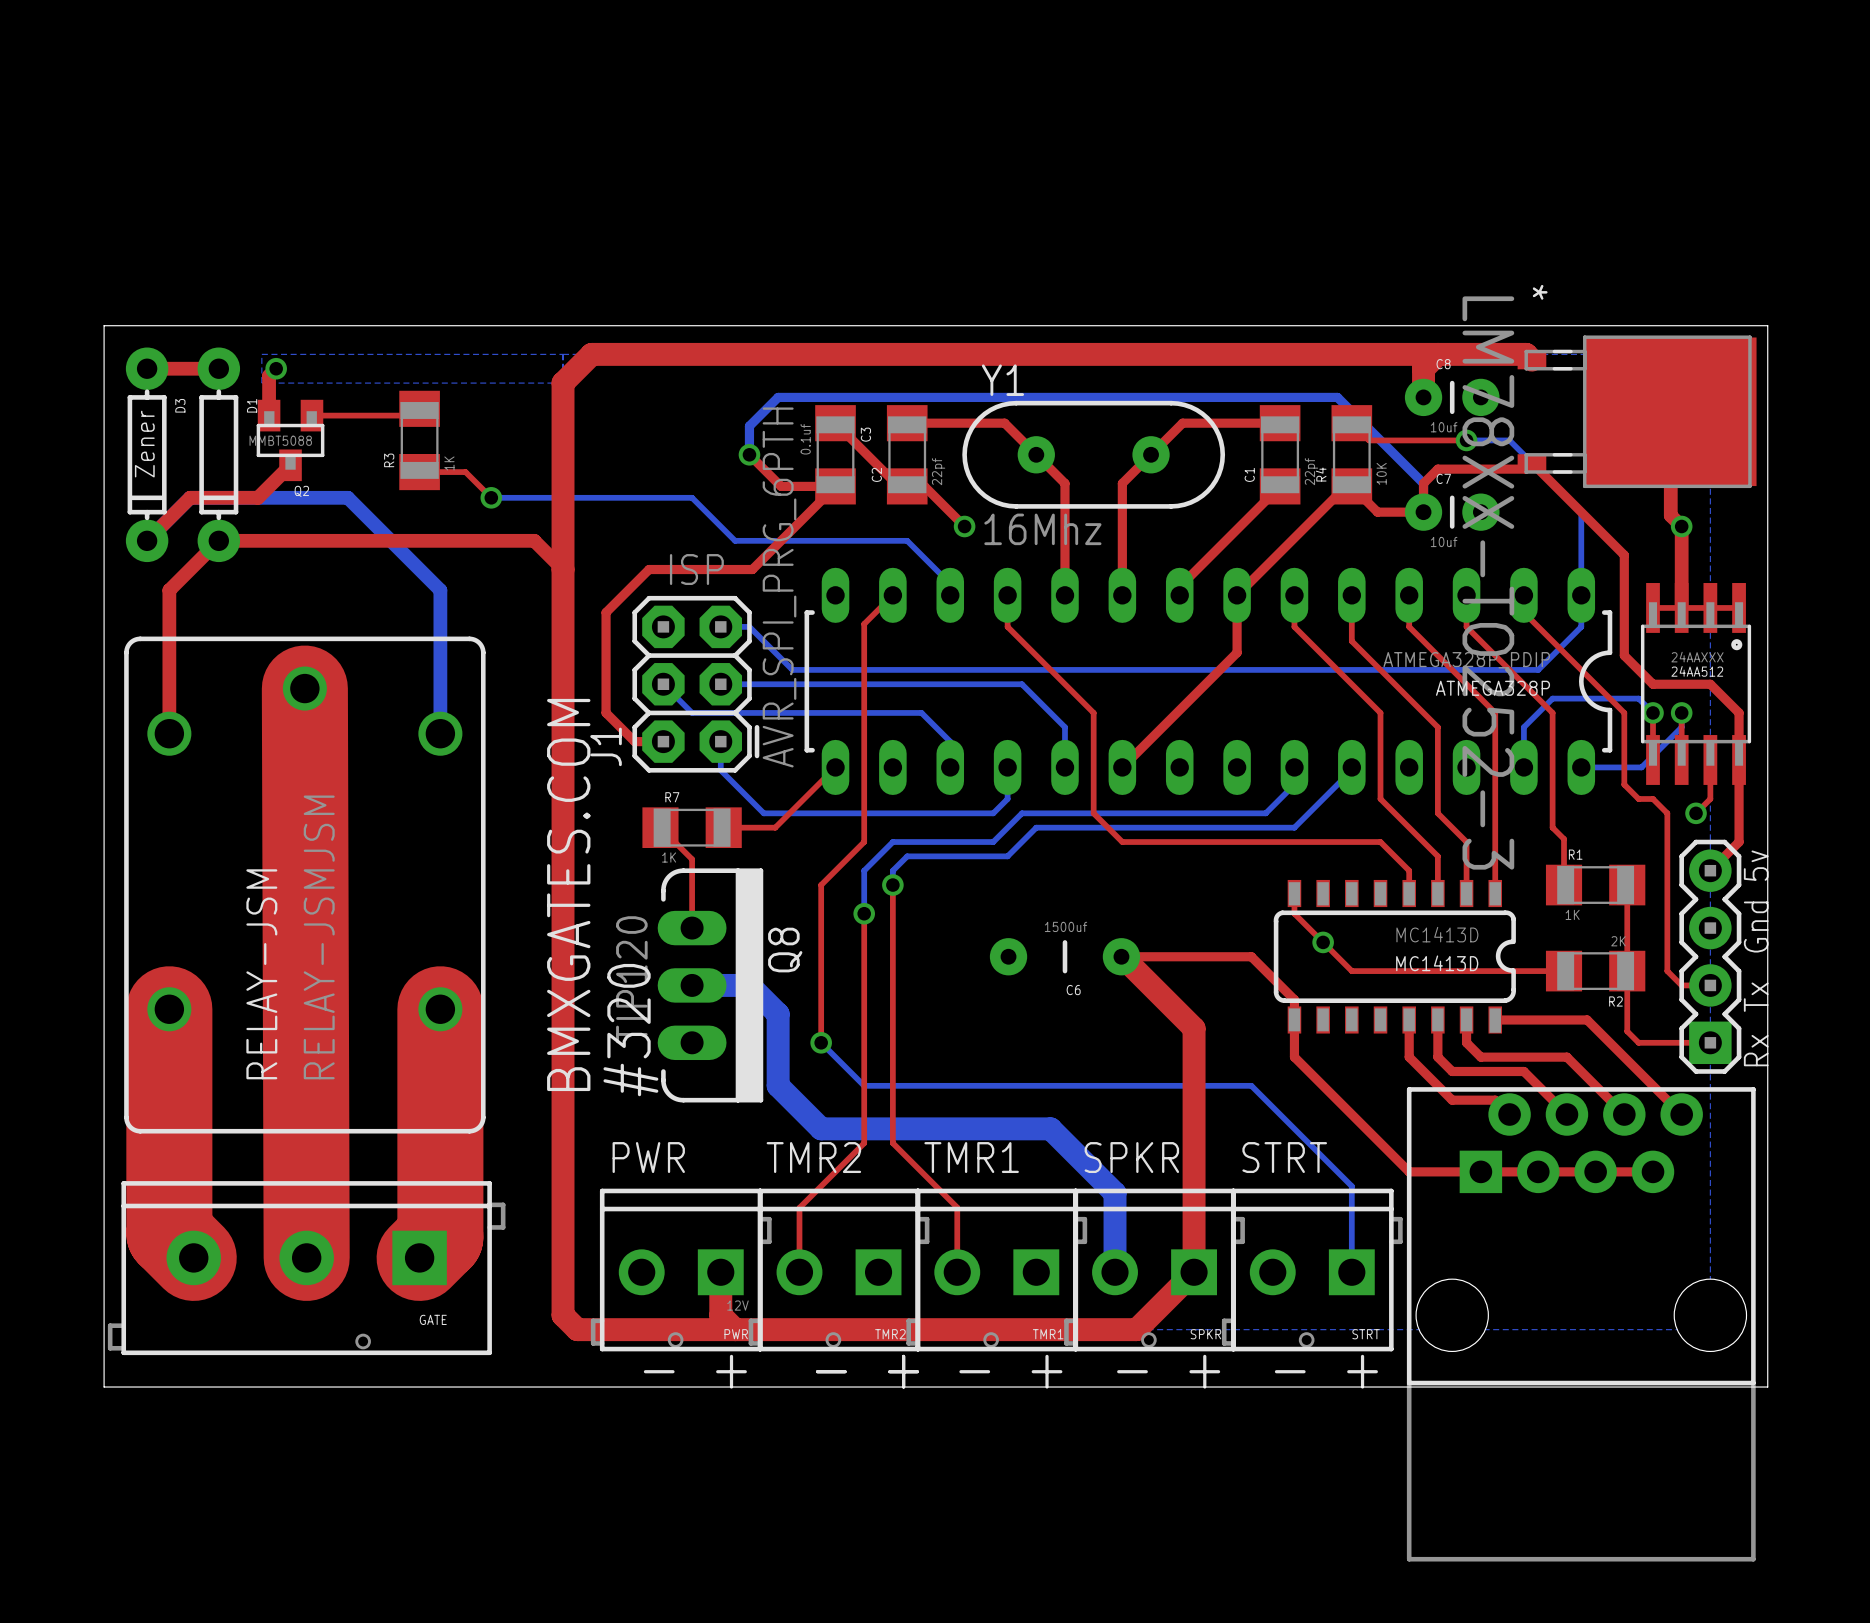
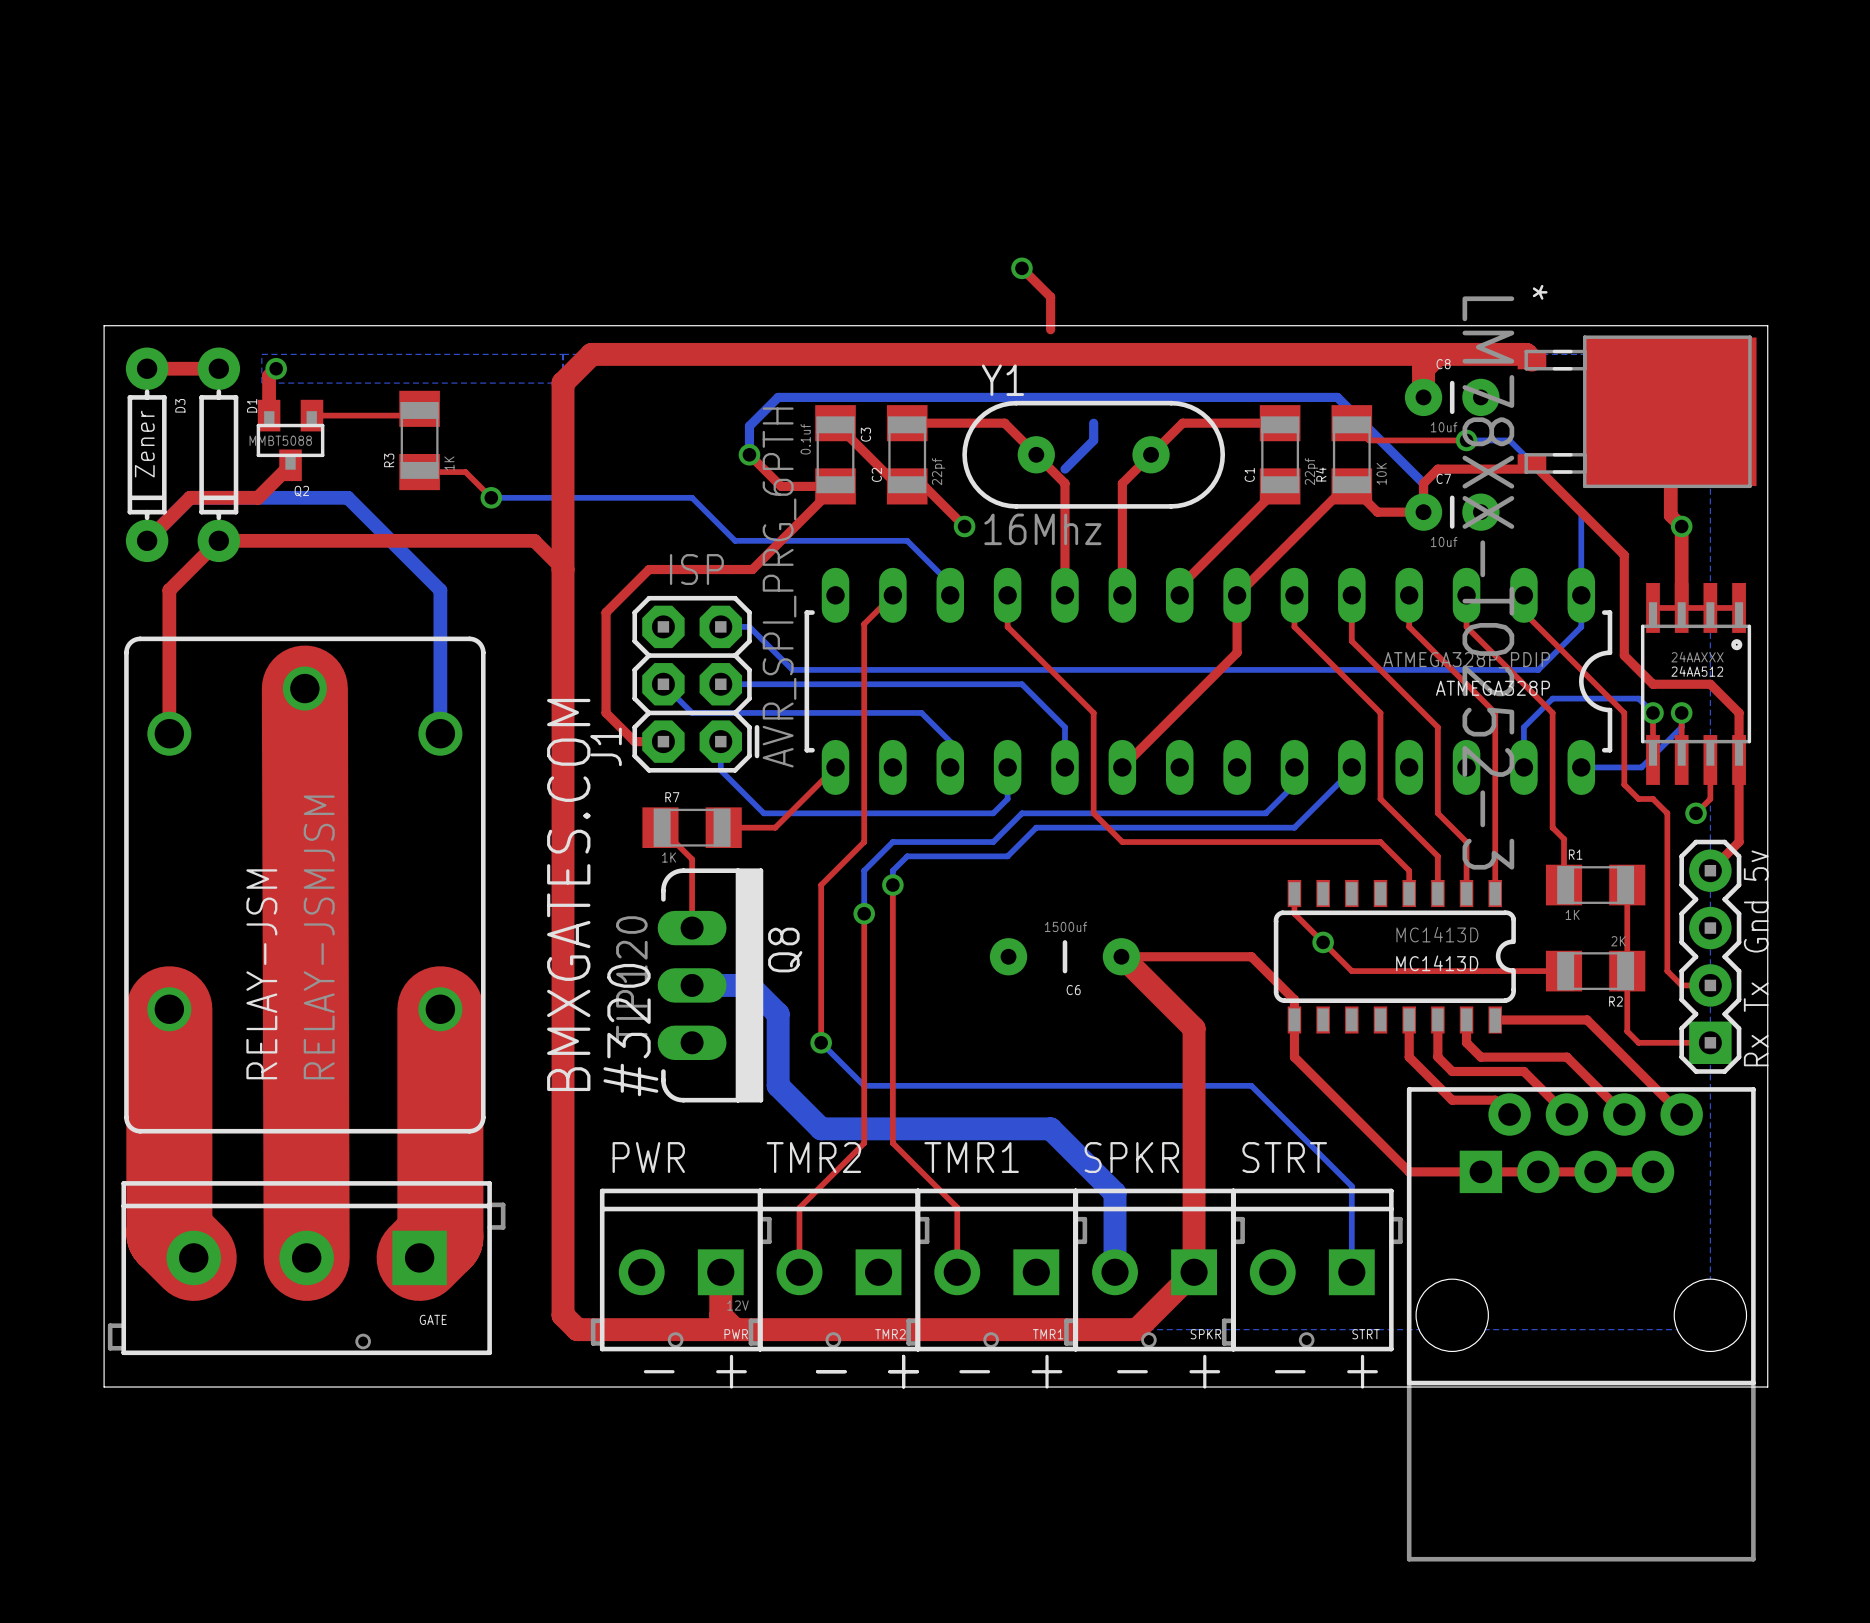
top track: none -> (1021, 268) (1050, 297) (1050, 329)
via: none -> (1021, 268)
bottom track: none -> (1093, 423) (1093, 440) (1064, 469)

